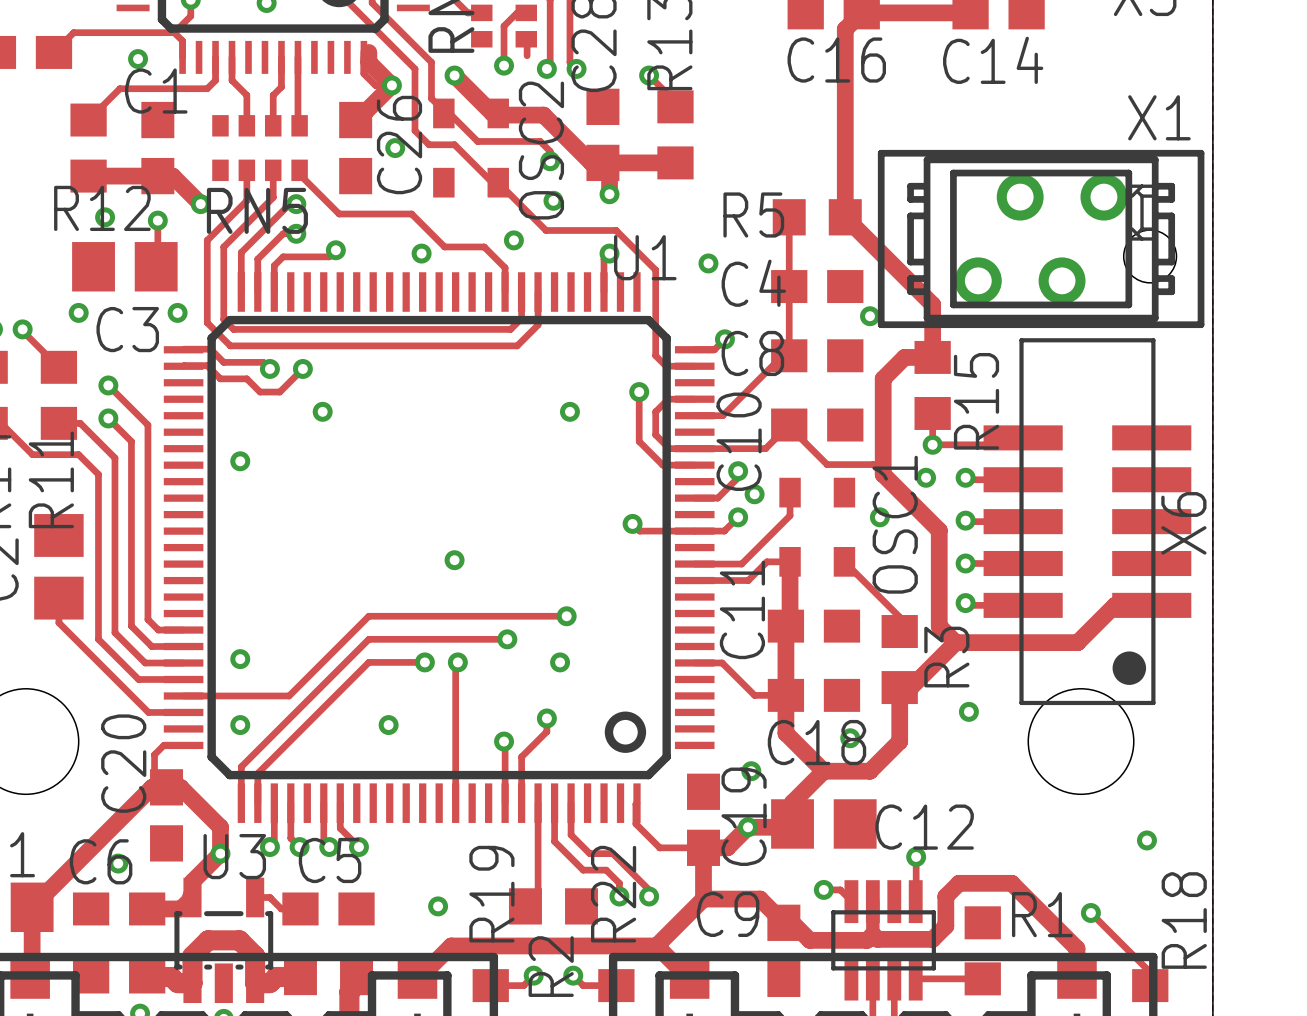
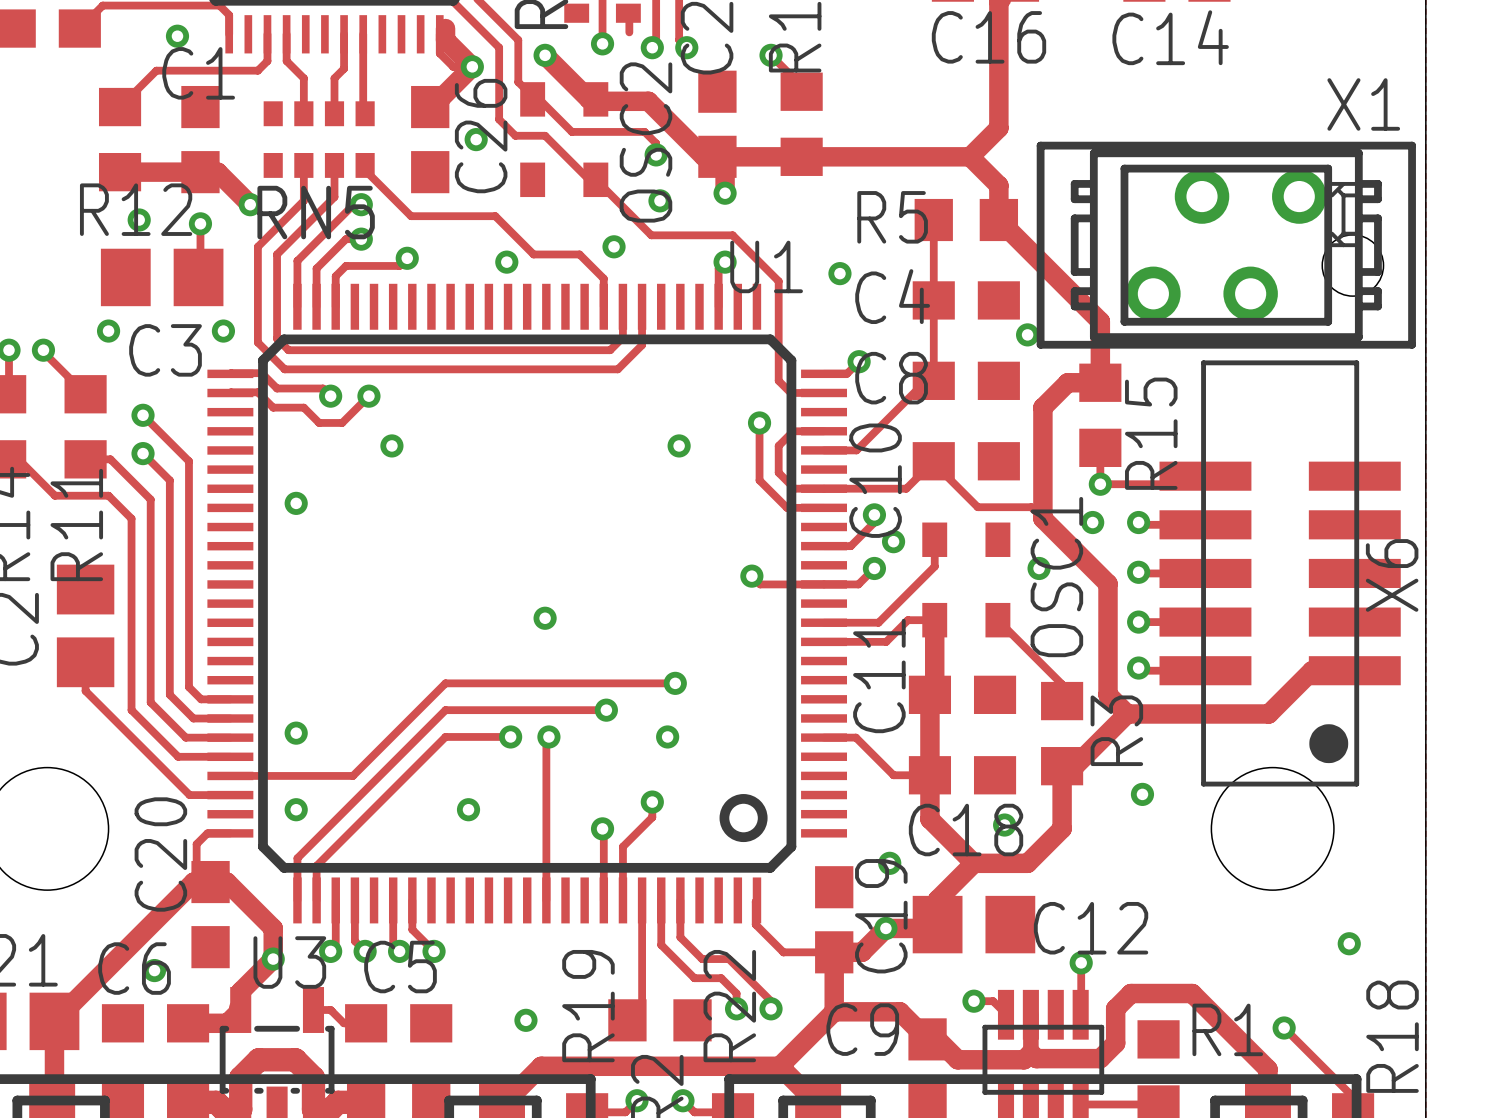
track: (845, 138) (845, 187) -> (998, 128) (970, 156)
track: none -> (801, 156) (970, 156)
track: none -> (970, 156) (998, 185)

